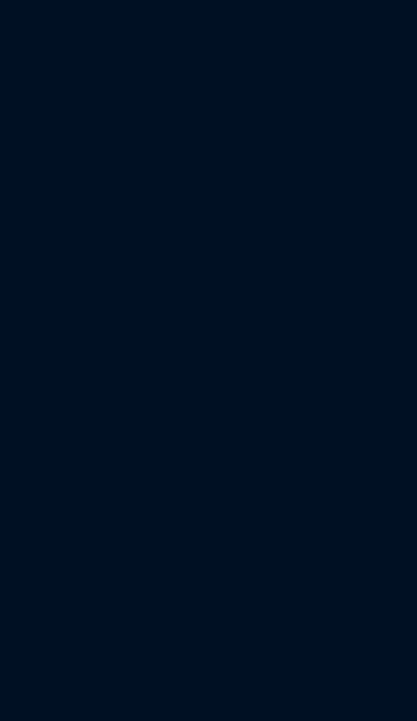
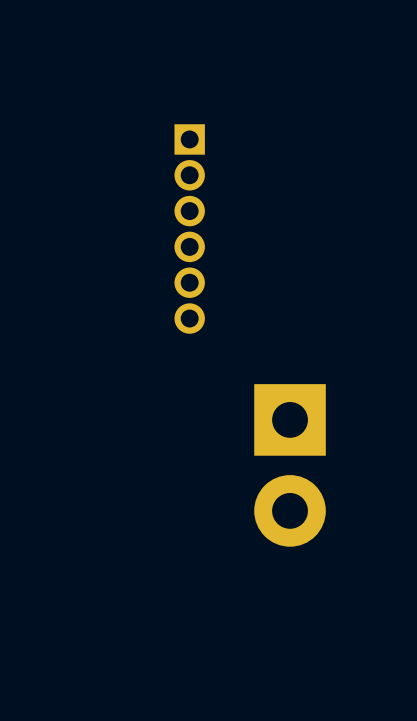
part: none -> (189, 228)
part: none -> (290, 465)

